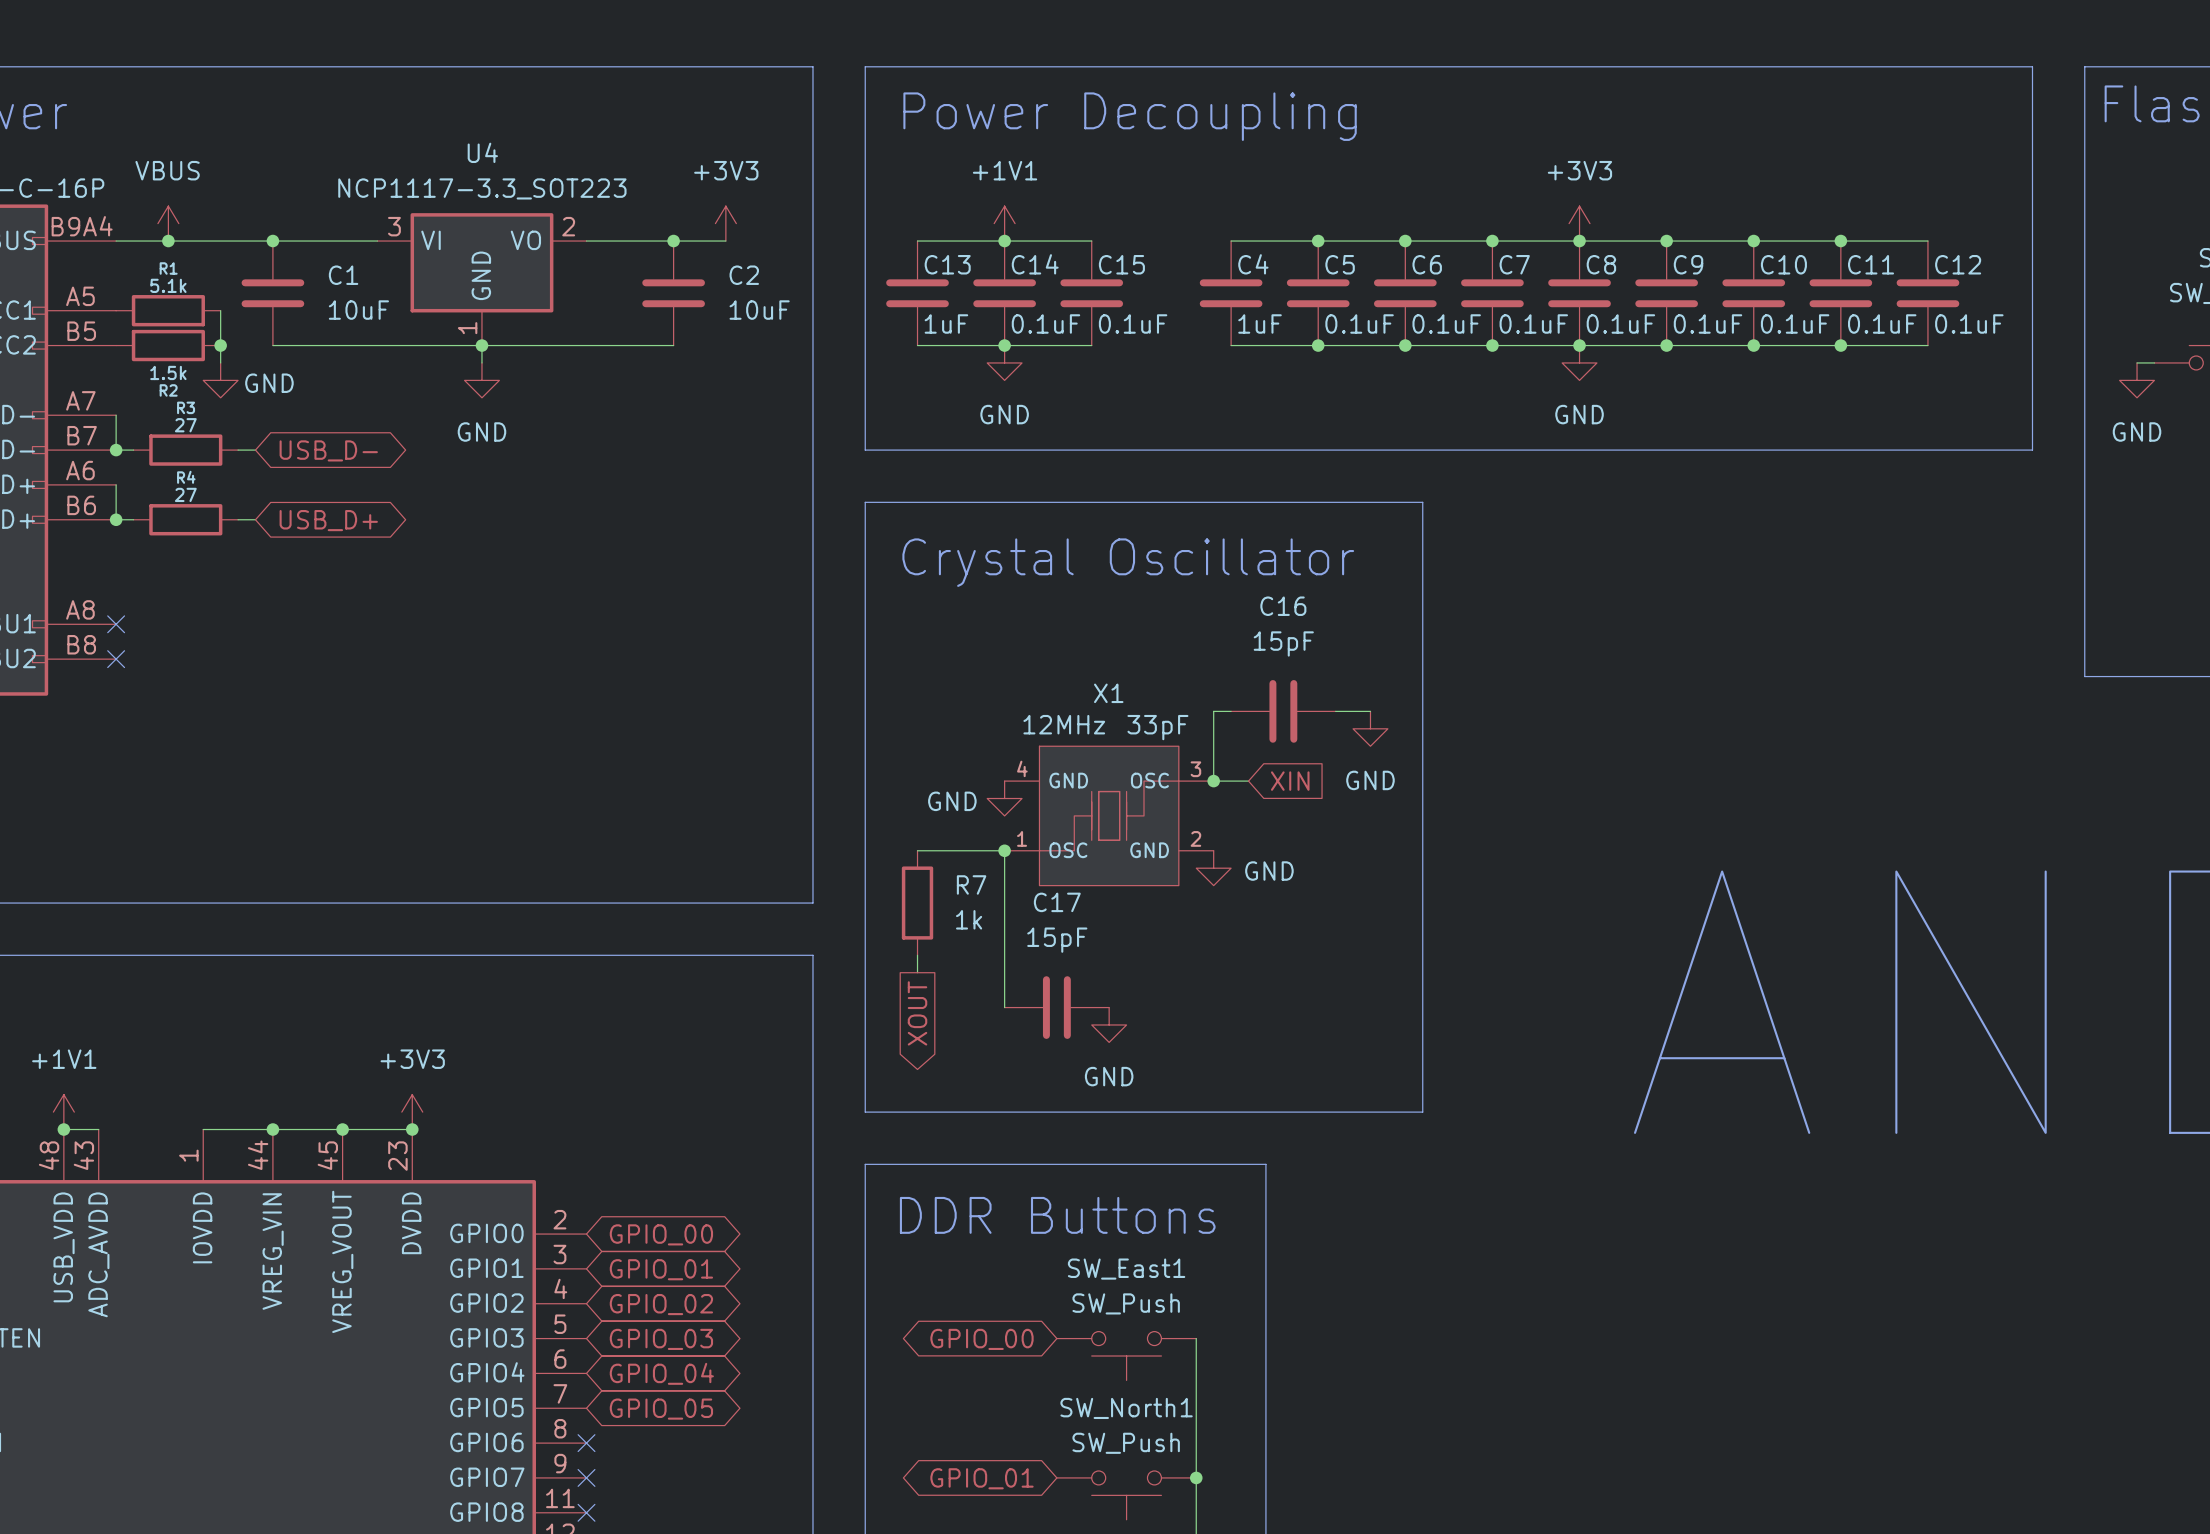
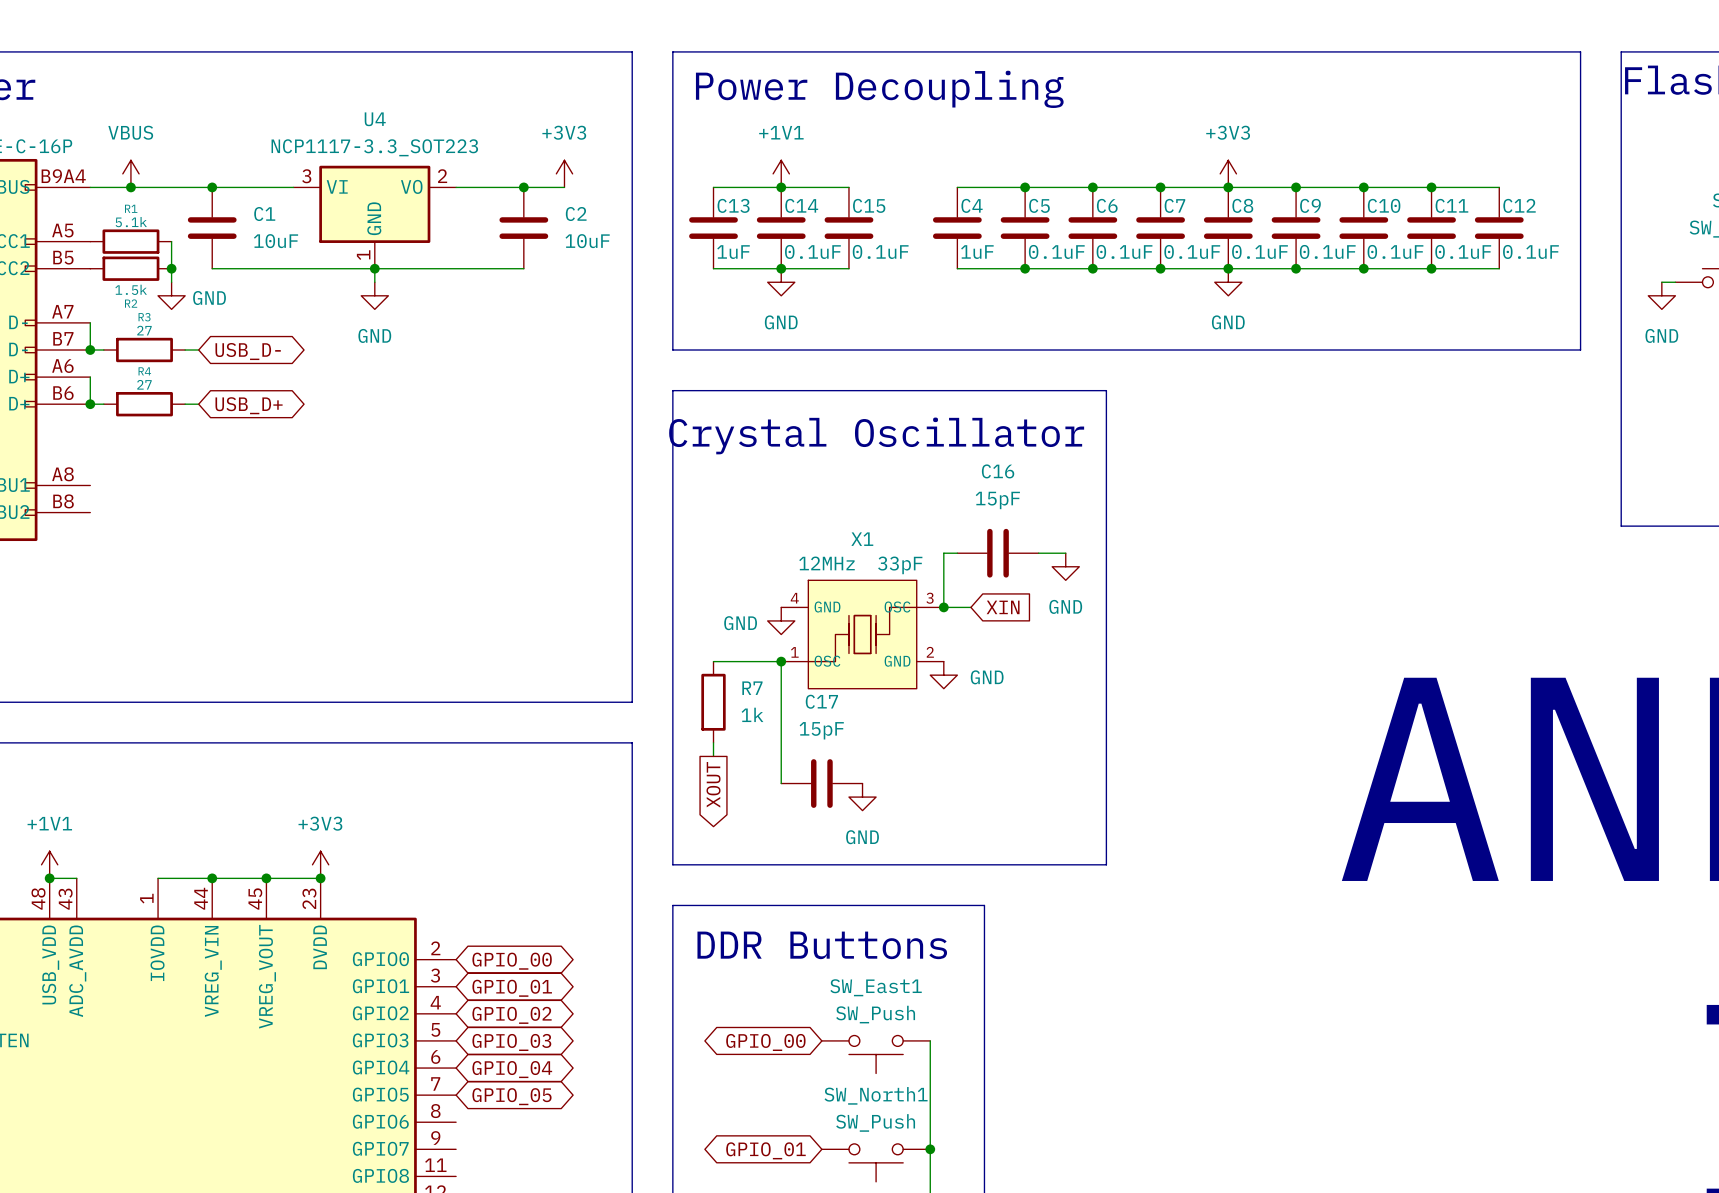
no-connect mark: (116, 624) -> none
no-connect mark: (116, 659) -> none
no-connect mark: (586, 1443) -> none
no-connect mark: (586, 1477) -> none
no-connect mark: (586, 1512) -> none

